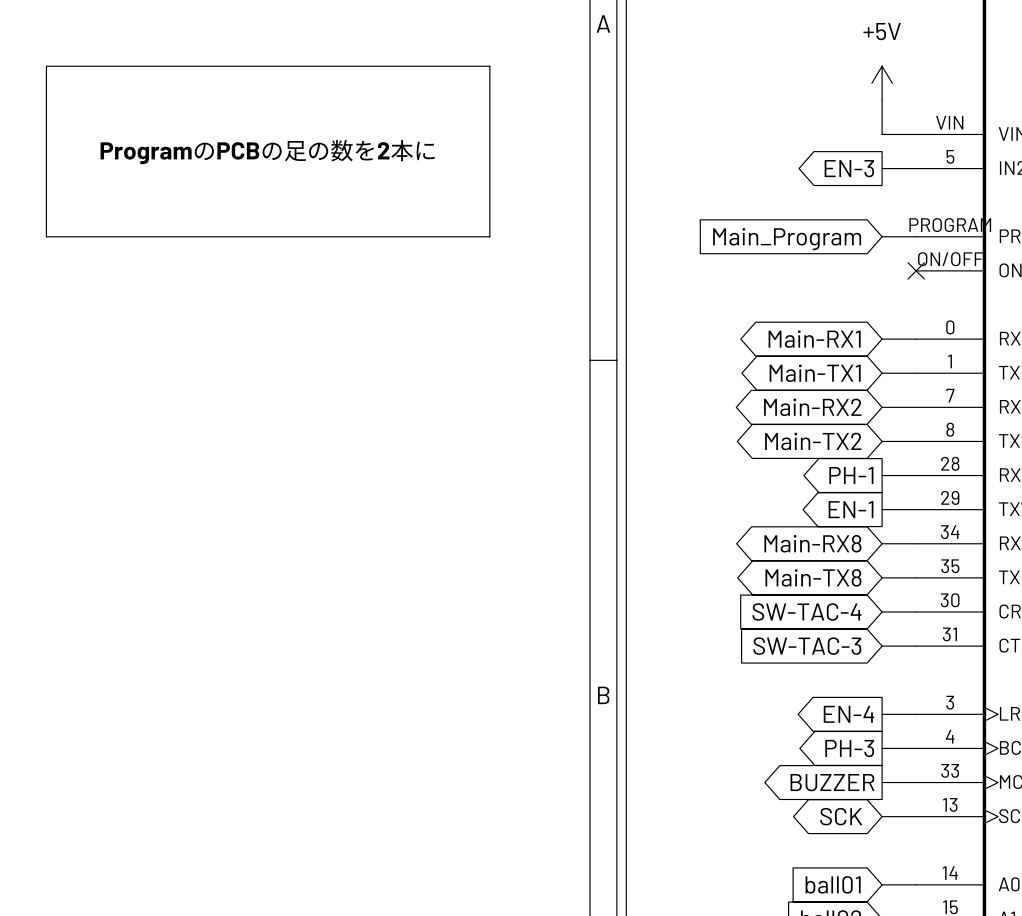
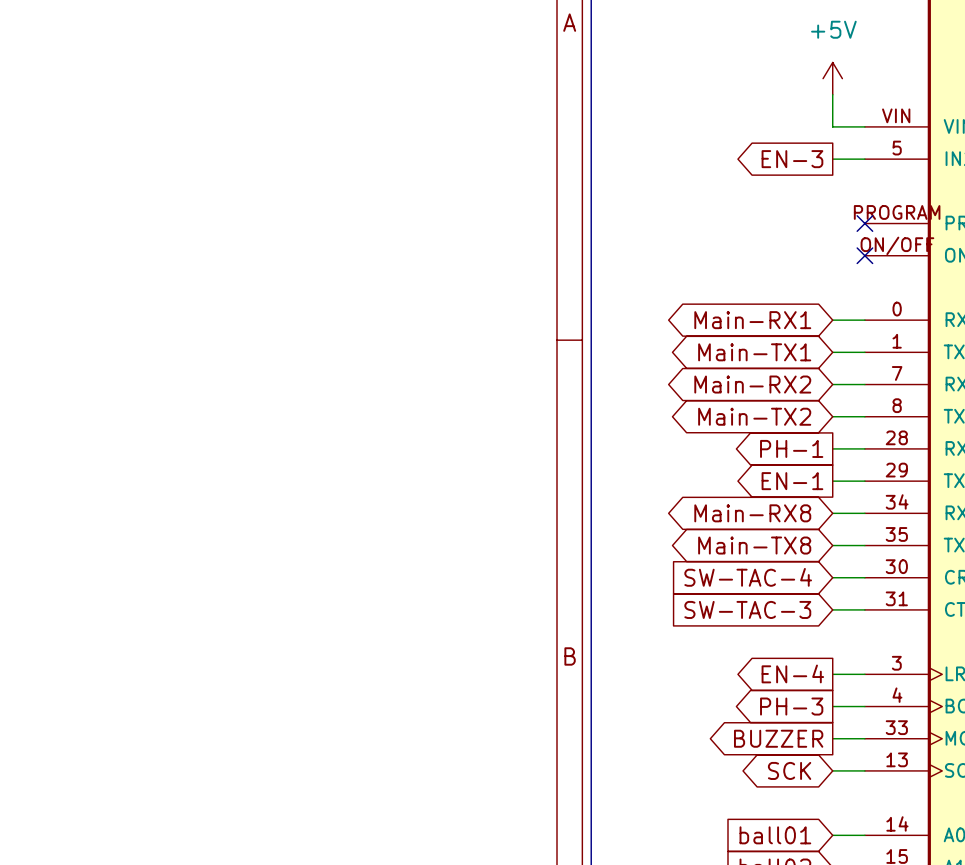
line: (46, 66) (489, 66) (489, 236) (46, 236) (46, 66) -> none
text: ProgramのPCBの足の数を2本に (267, 152) -> none
wire: (882, 236) (916, 236) -> none
no-connect mark: none -> (864, 223)
global label: Main_Program (787, 239) -> none

